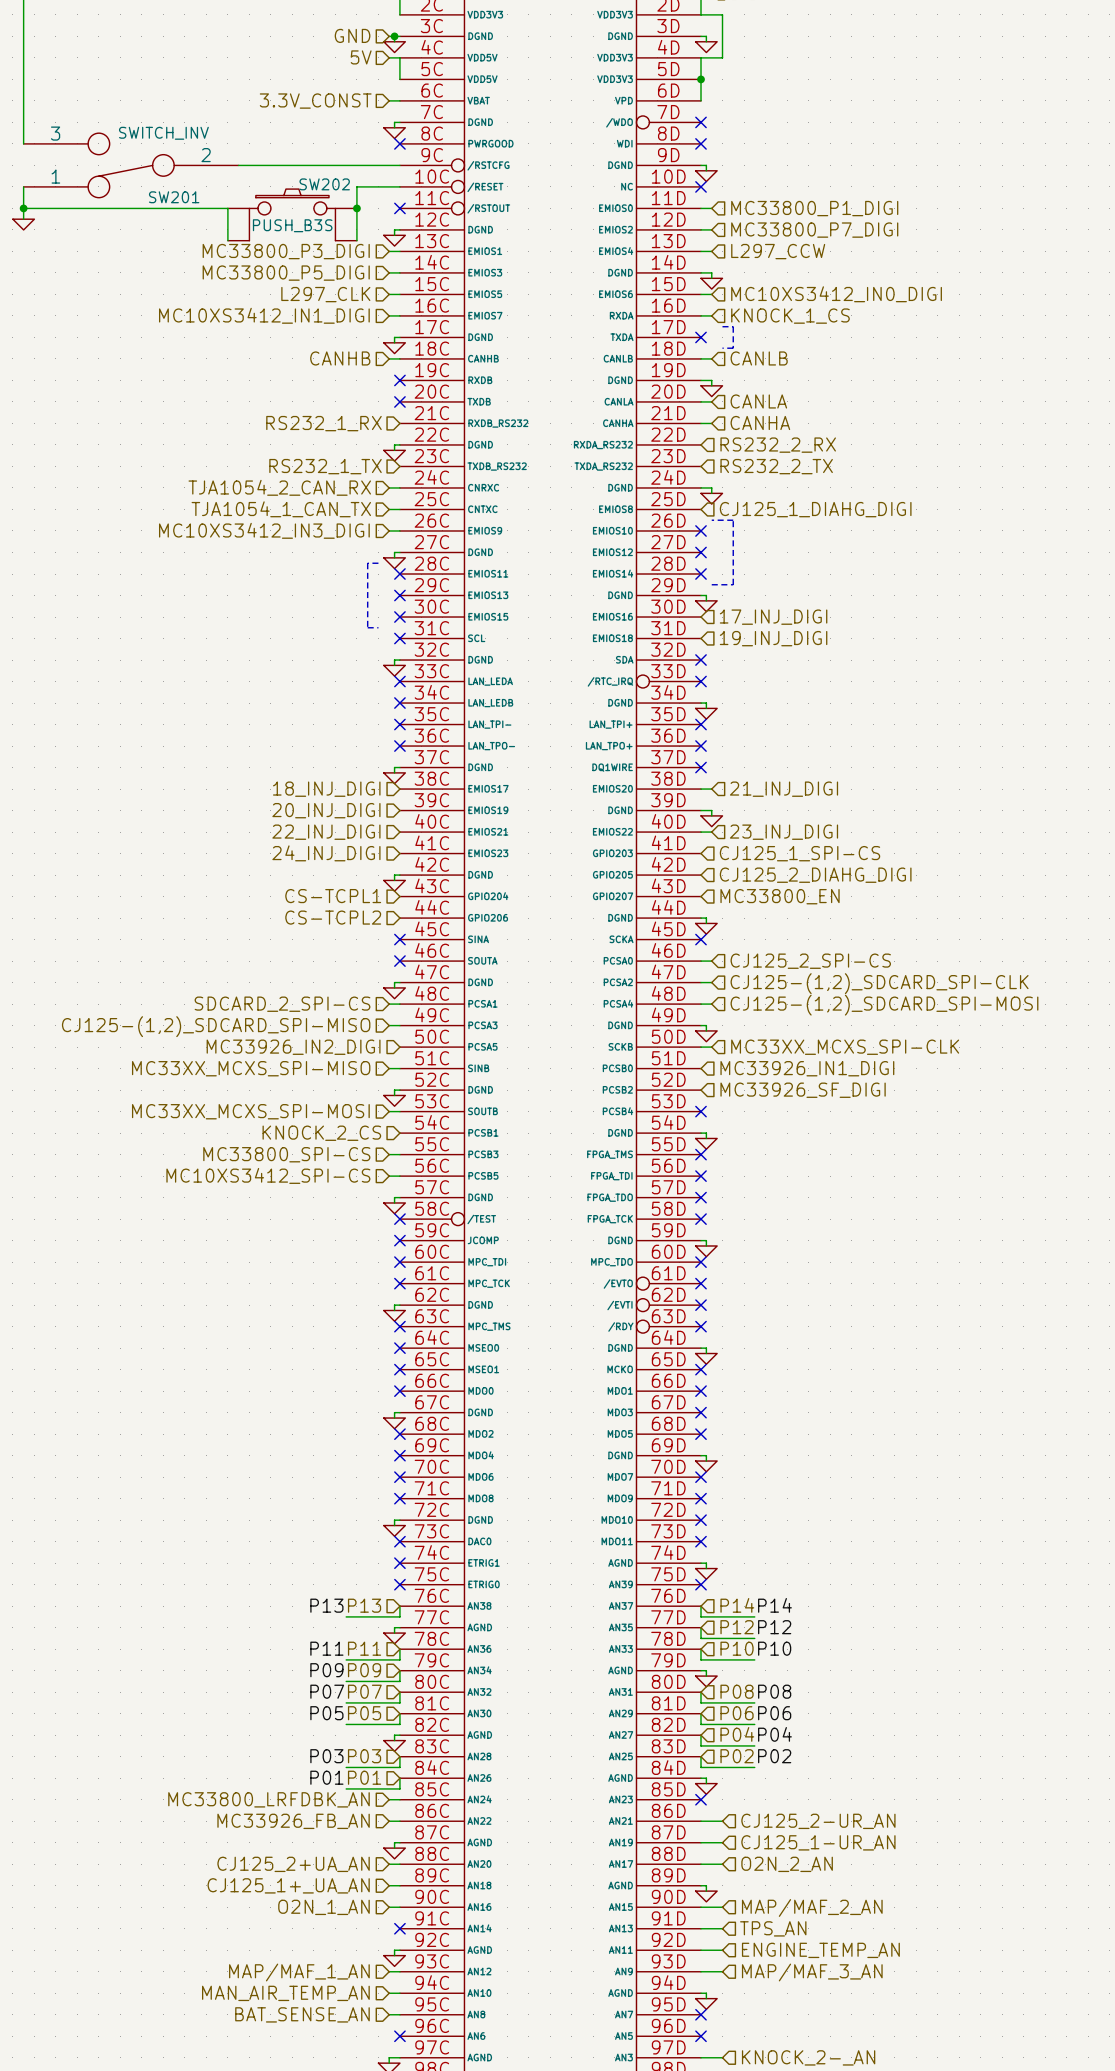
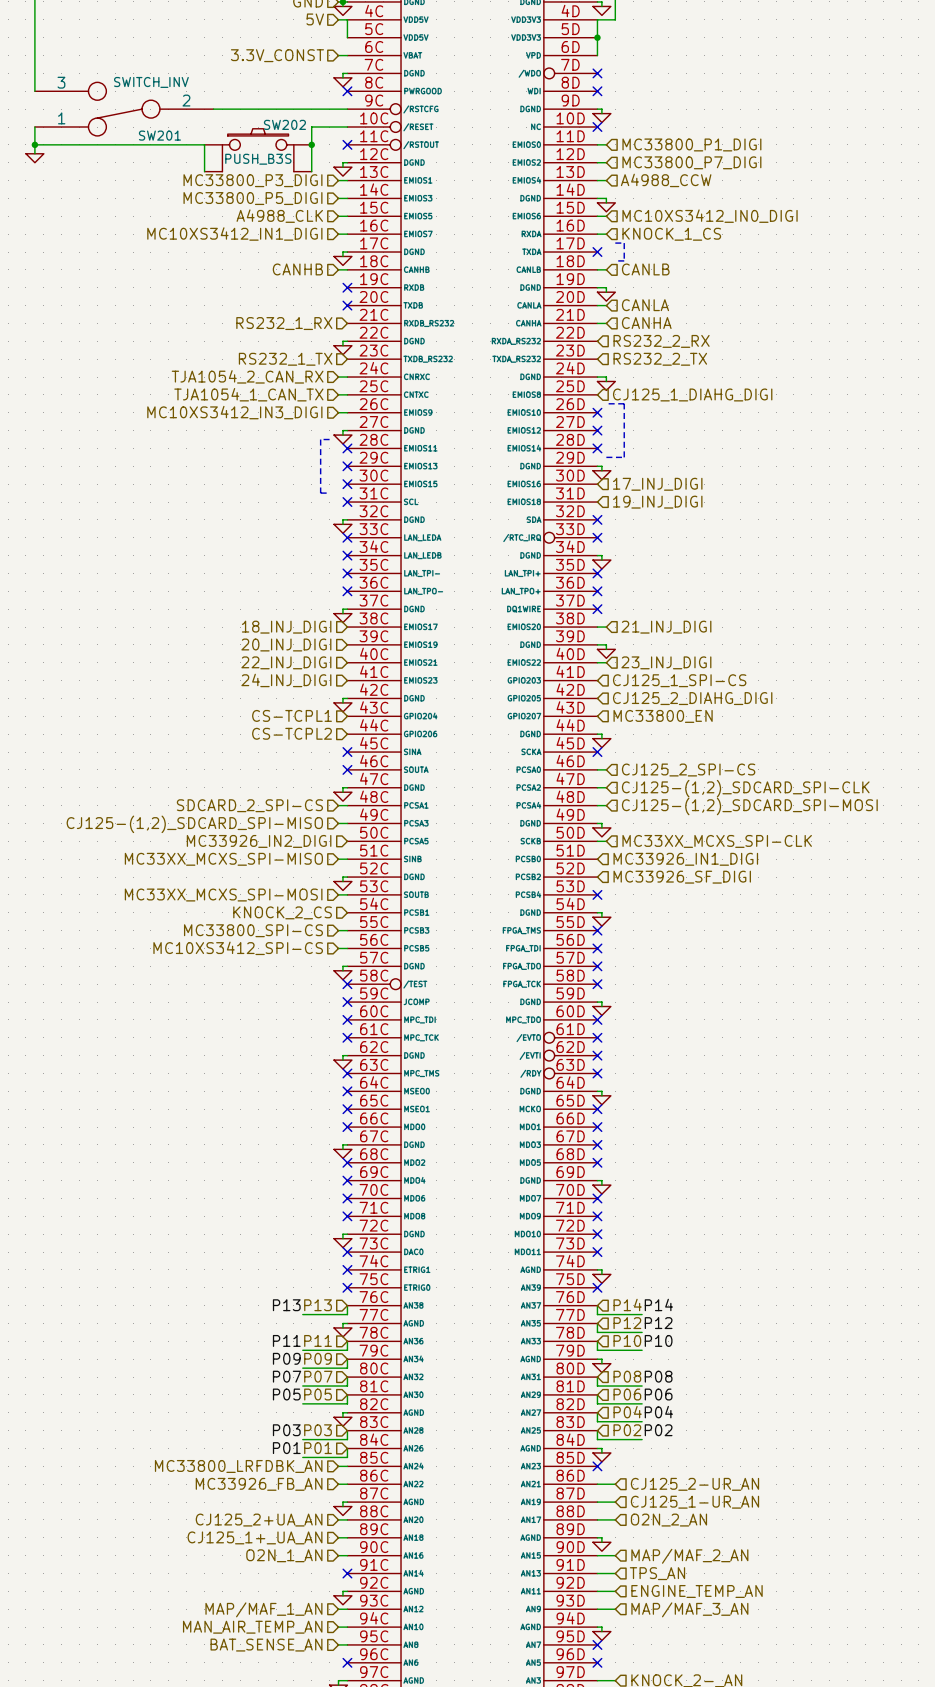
hierarchical label: L297_CCW (778, 251) -> A4988_CCW (666, 180)
hierarchical label: L297_CLK (325, 294) -> A4988_CLK (279, 216)

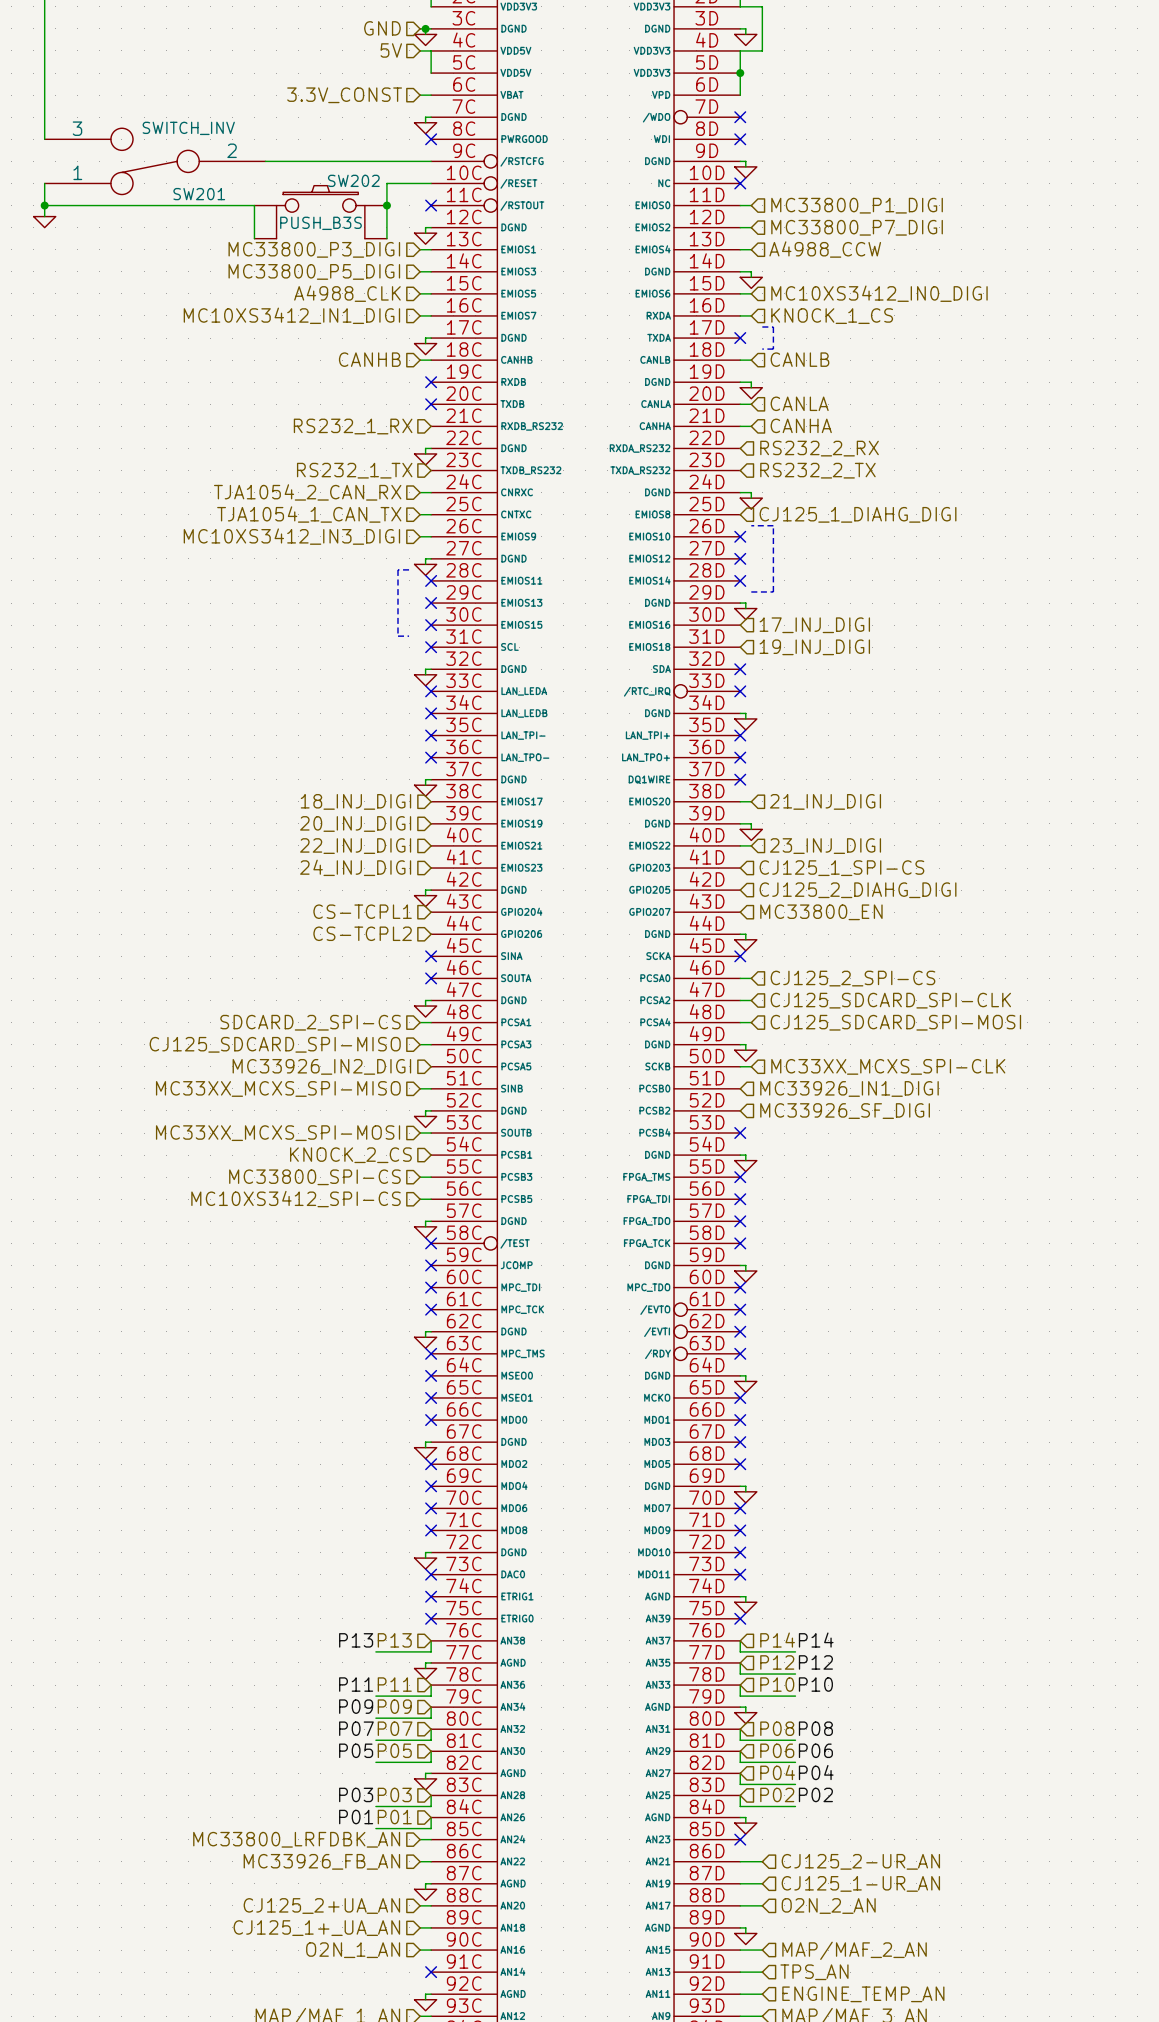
hierarchical label: CJ125-(1,2)_SDCARD_SPI-CLK (745, 788) -> CJ125_SDCARD_SPI-CLK (890, 1000)
hierarchical label: CJ125-(1,2)_SDCARD_SPI-MOSI (749, 806) -> CJ125_SDCARD_SPI-MOSI (895, 1022)
hierarchical label: CJ125-(1,2)_SDCARD_SPI-MISO (194, 824) -> CJ125_SDCARD_SPI-MISO (275, 1044)

